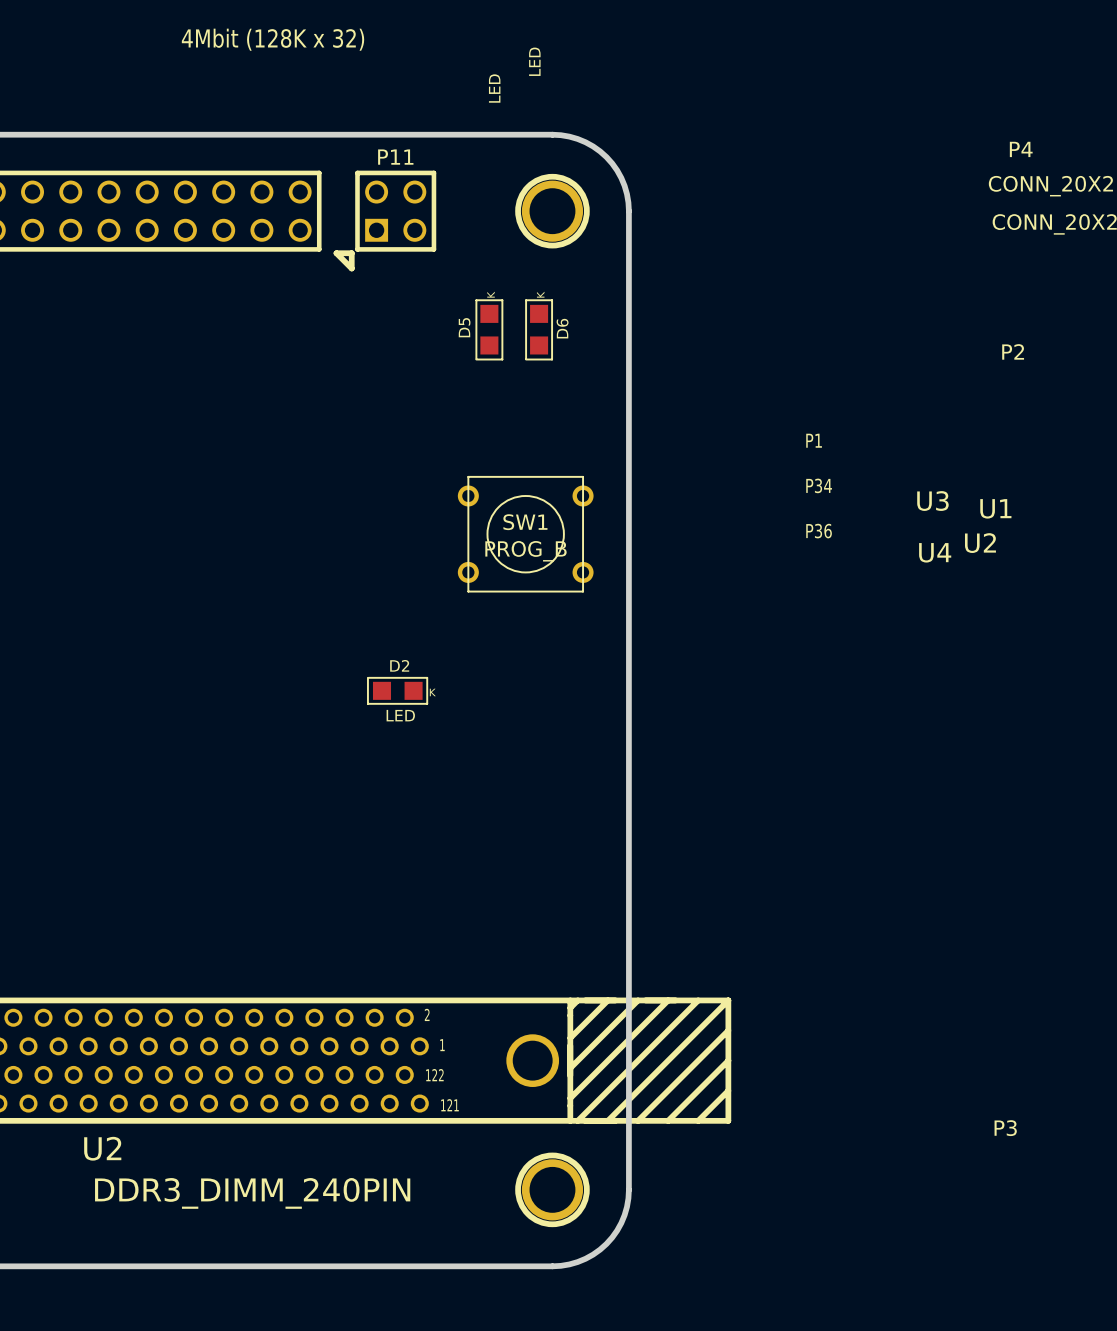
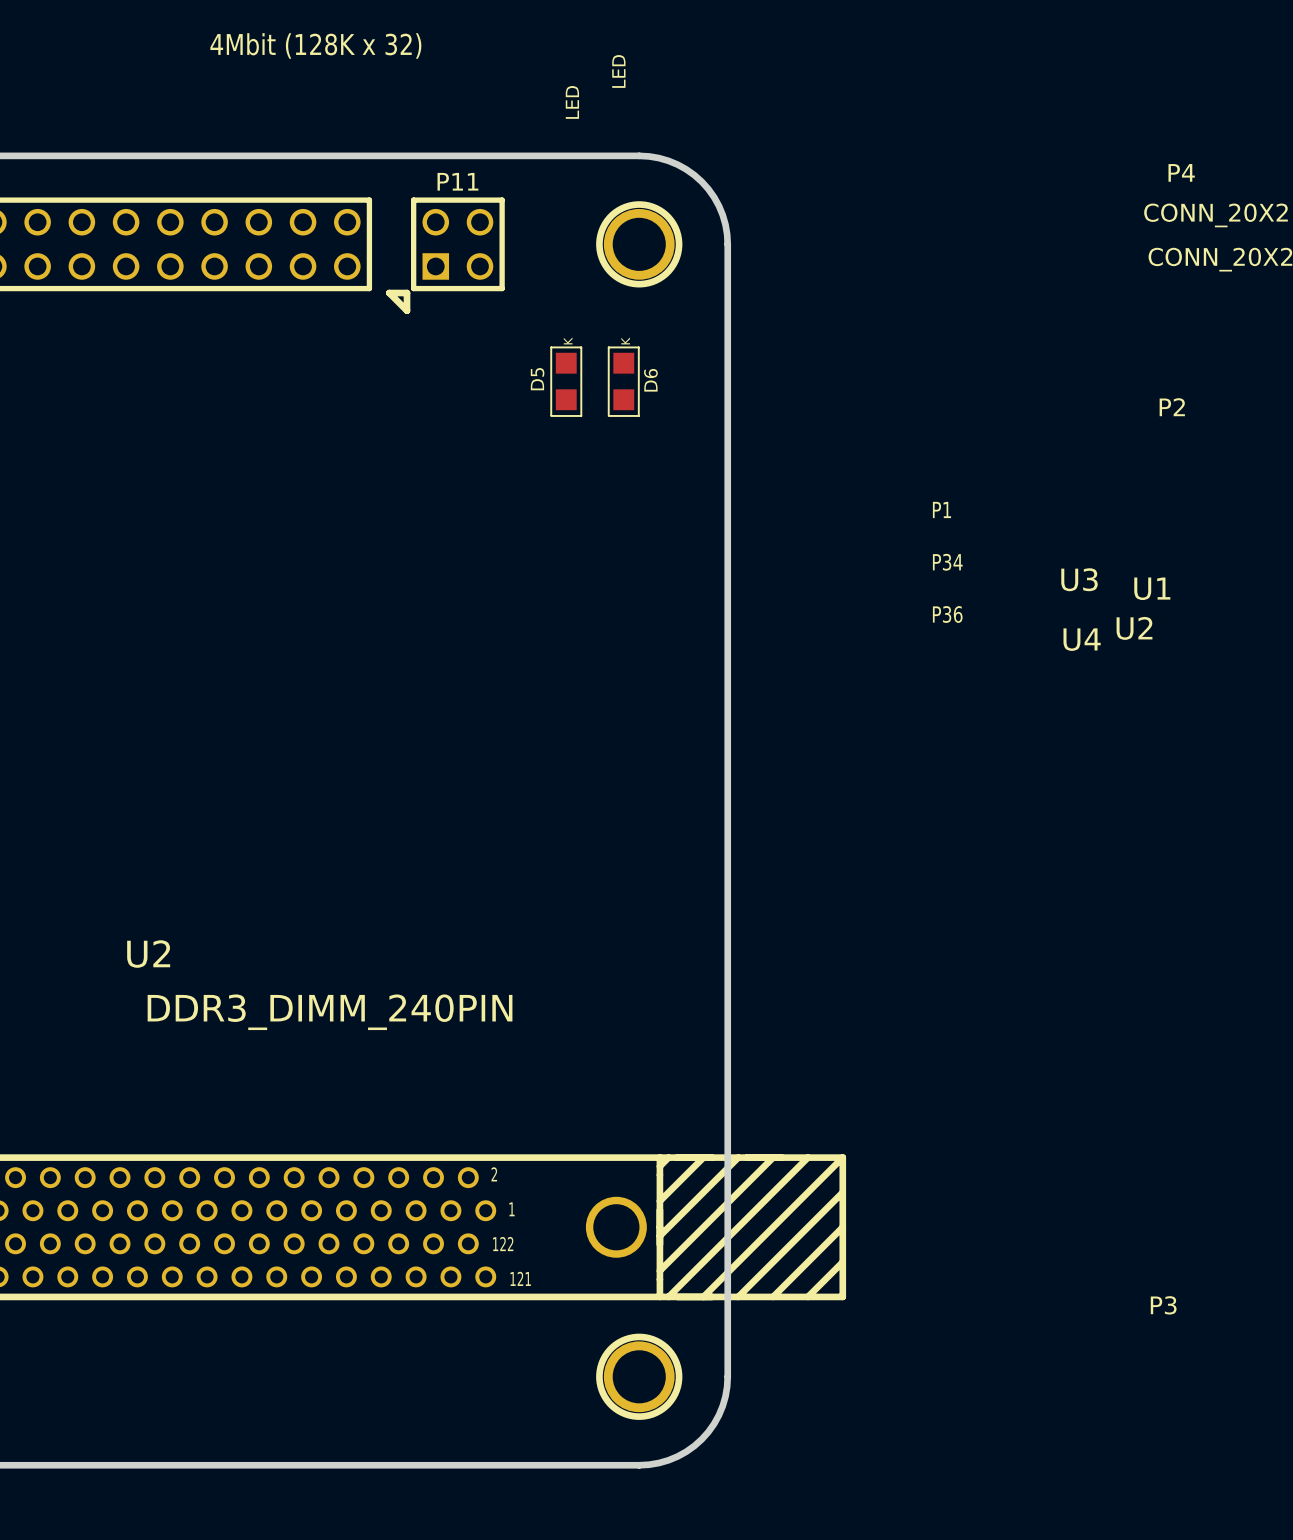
SW1: PROG_B (525, 534) -> none
D2: LED (397, 690) -> none
U2 name position: U2 (102, 1148) -> U2 (148, 954)
U2 value position: DDR3_DIMM_240PIN (252, 1193) -> DDR3_DIMM_240PIN (330, 1012)

